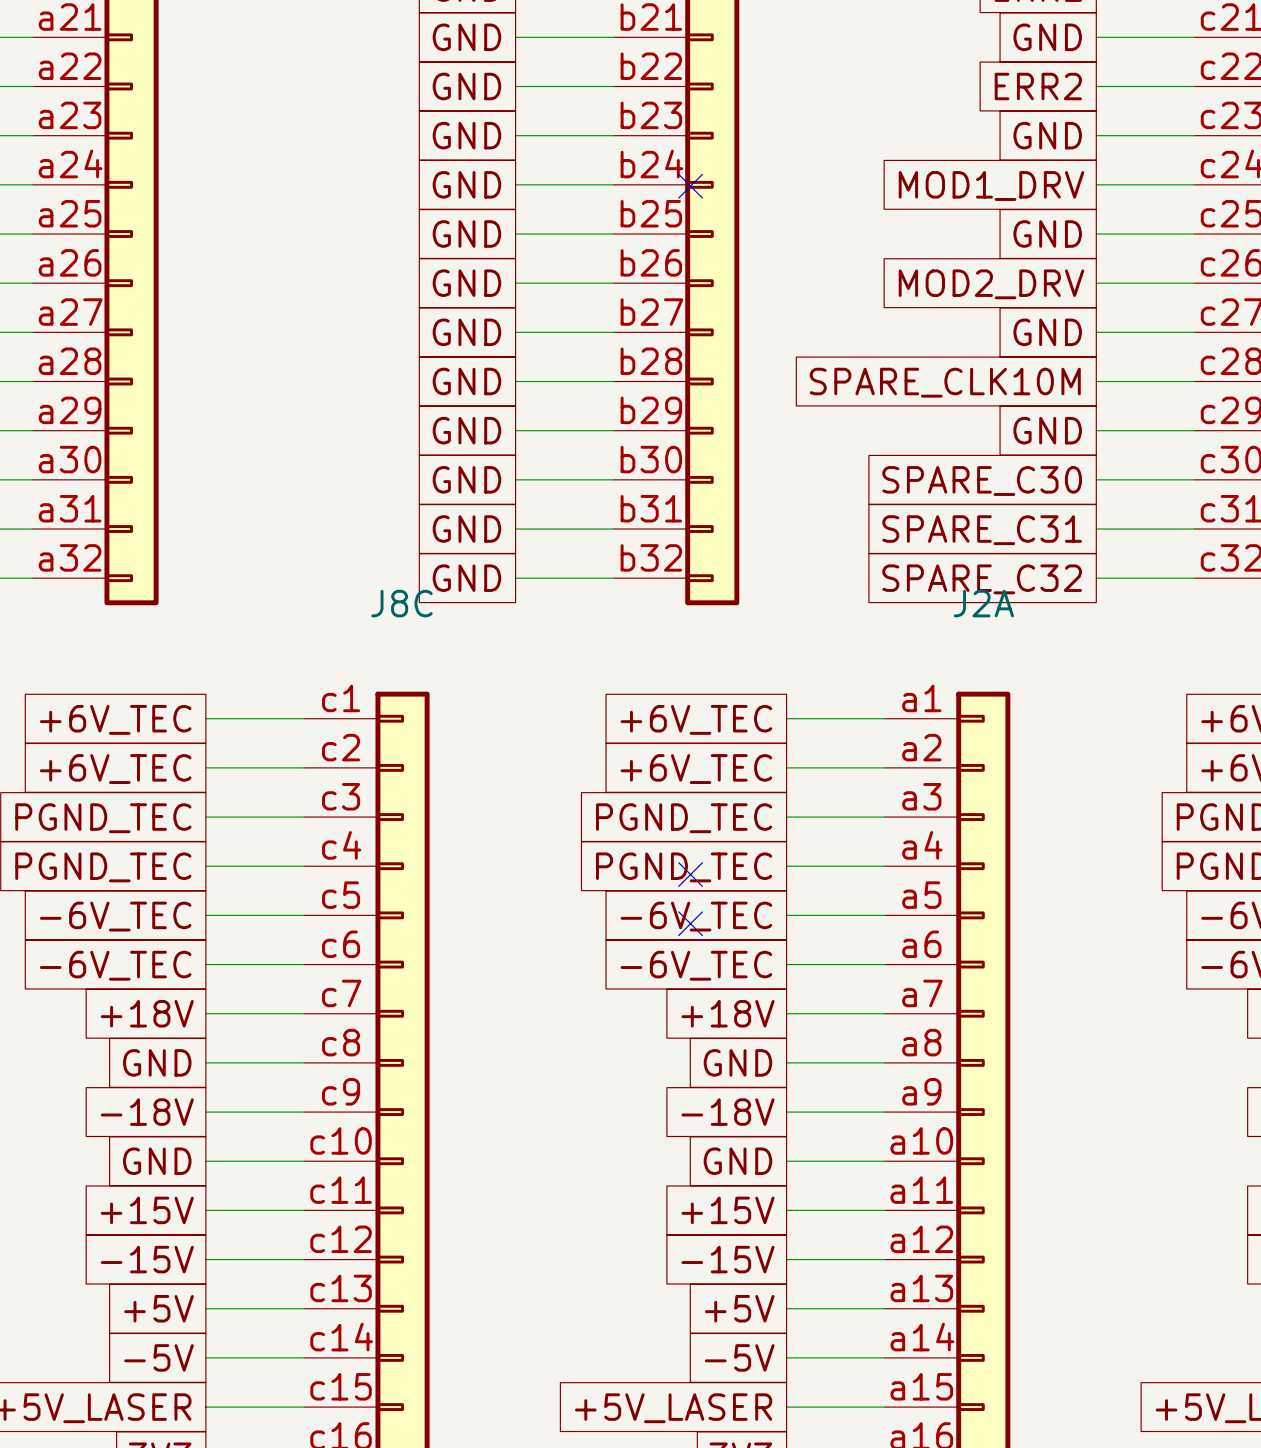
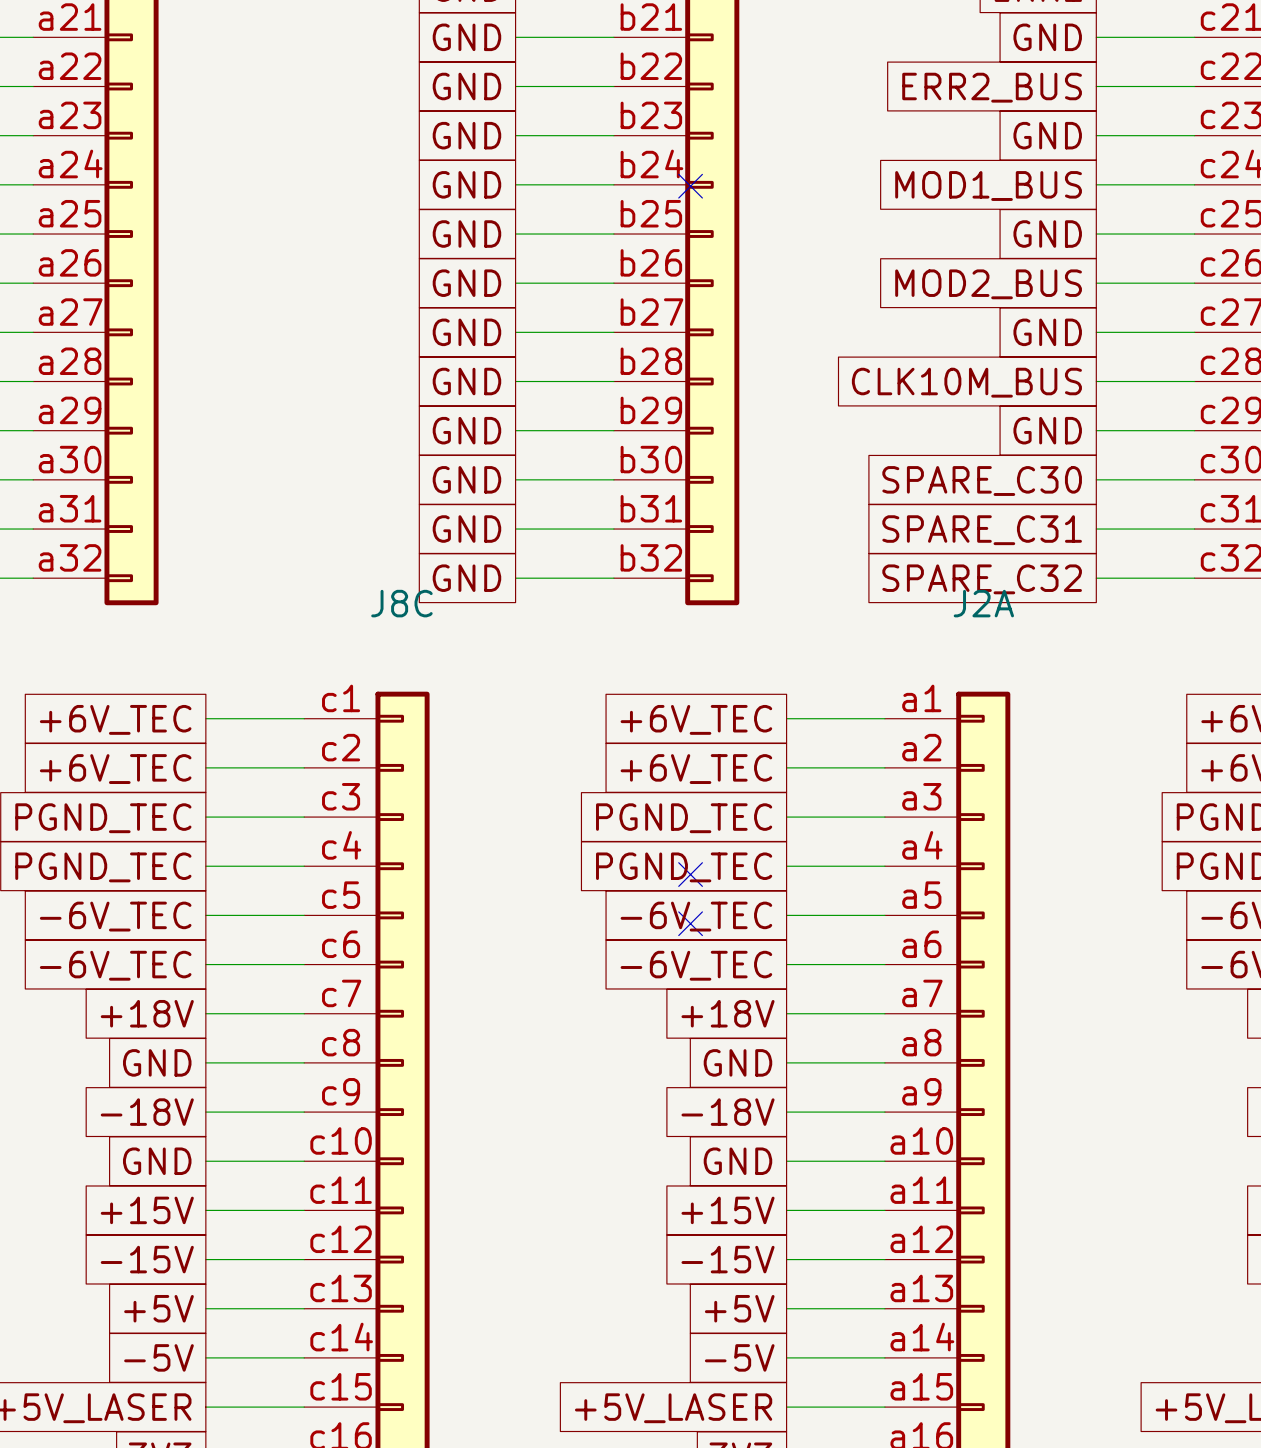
global label: ERR2 (1038, 86) -> ERR2_BUS (992, 87)
global label: MOD1_DRV (991, 186) -> MOD1_BUS (988, 186)
global label: MOD2_DRV (991, 284) -> MOD2_BUS (988, 284)
global label: SPARE_CLK10M (945, 382) -> CLK10M_BUS (966, 382)

